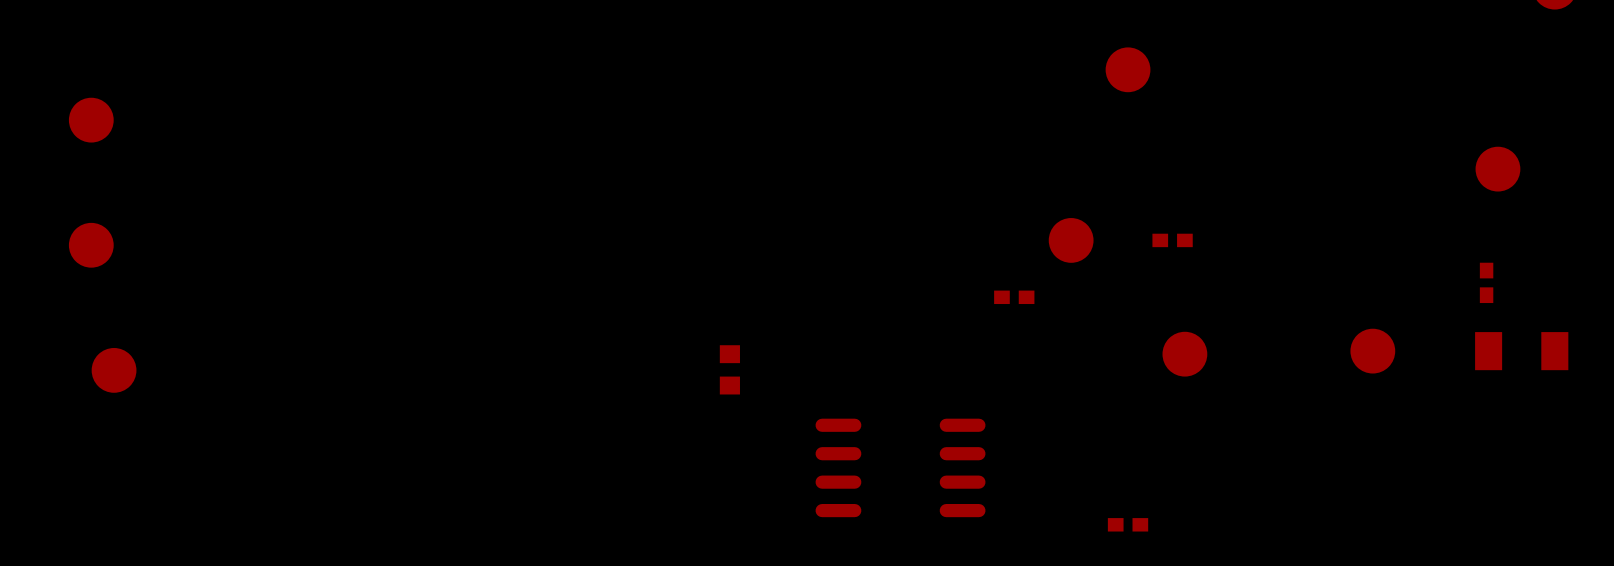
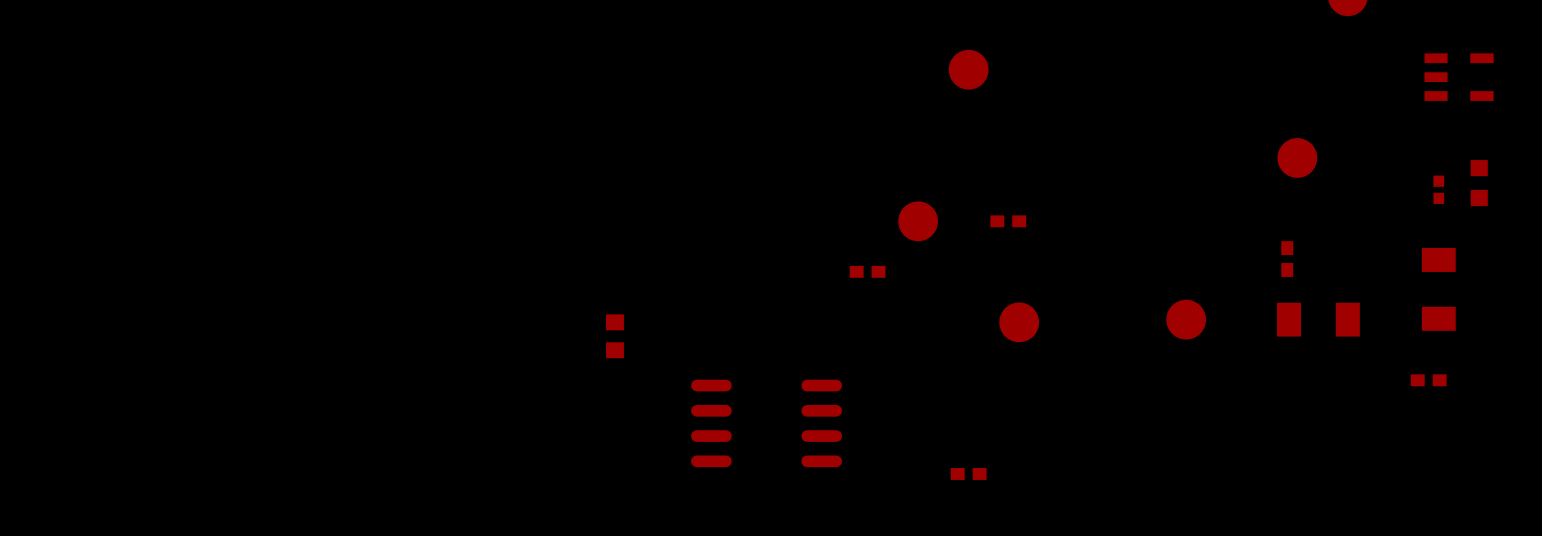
part: (91, 120) -> none
part: (91, 245) -> none
part: (114, 370) -> none

